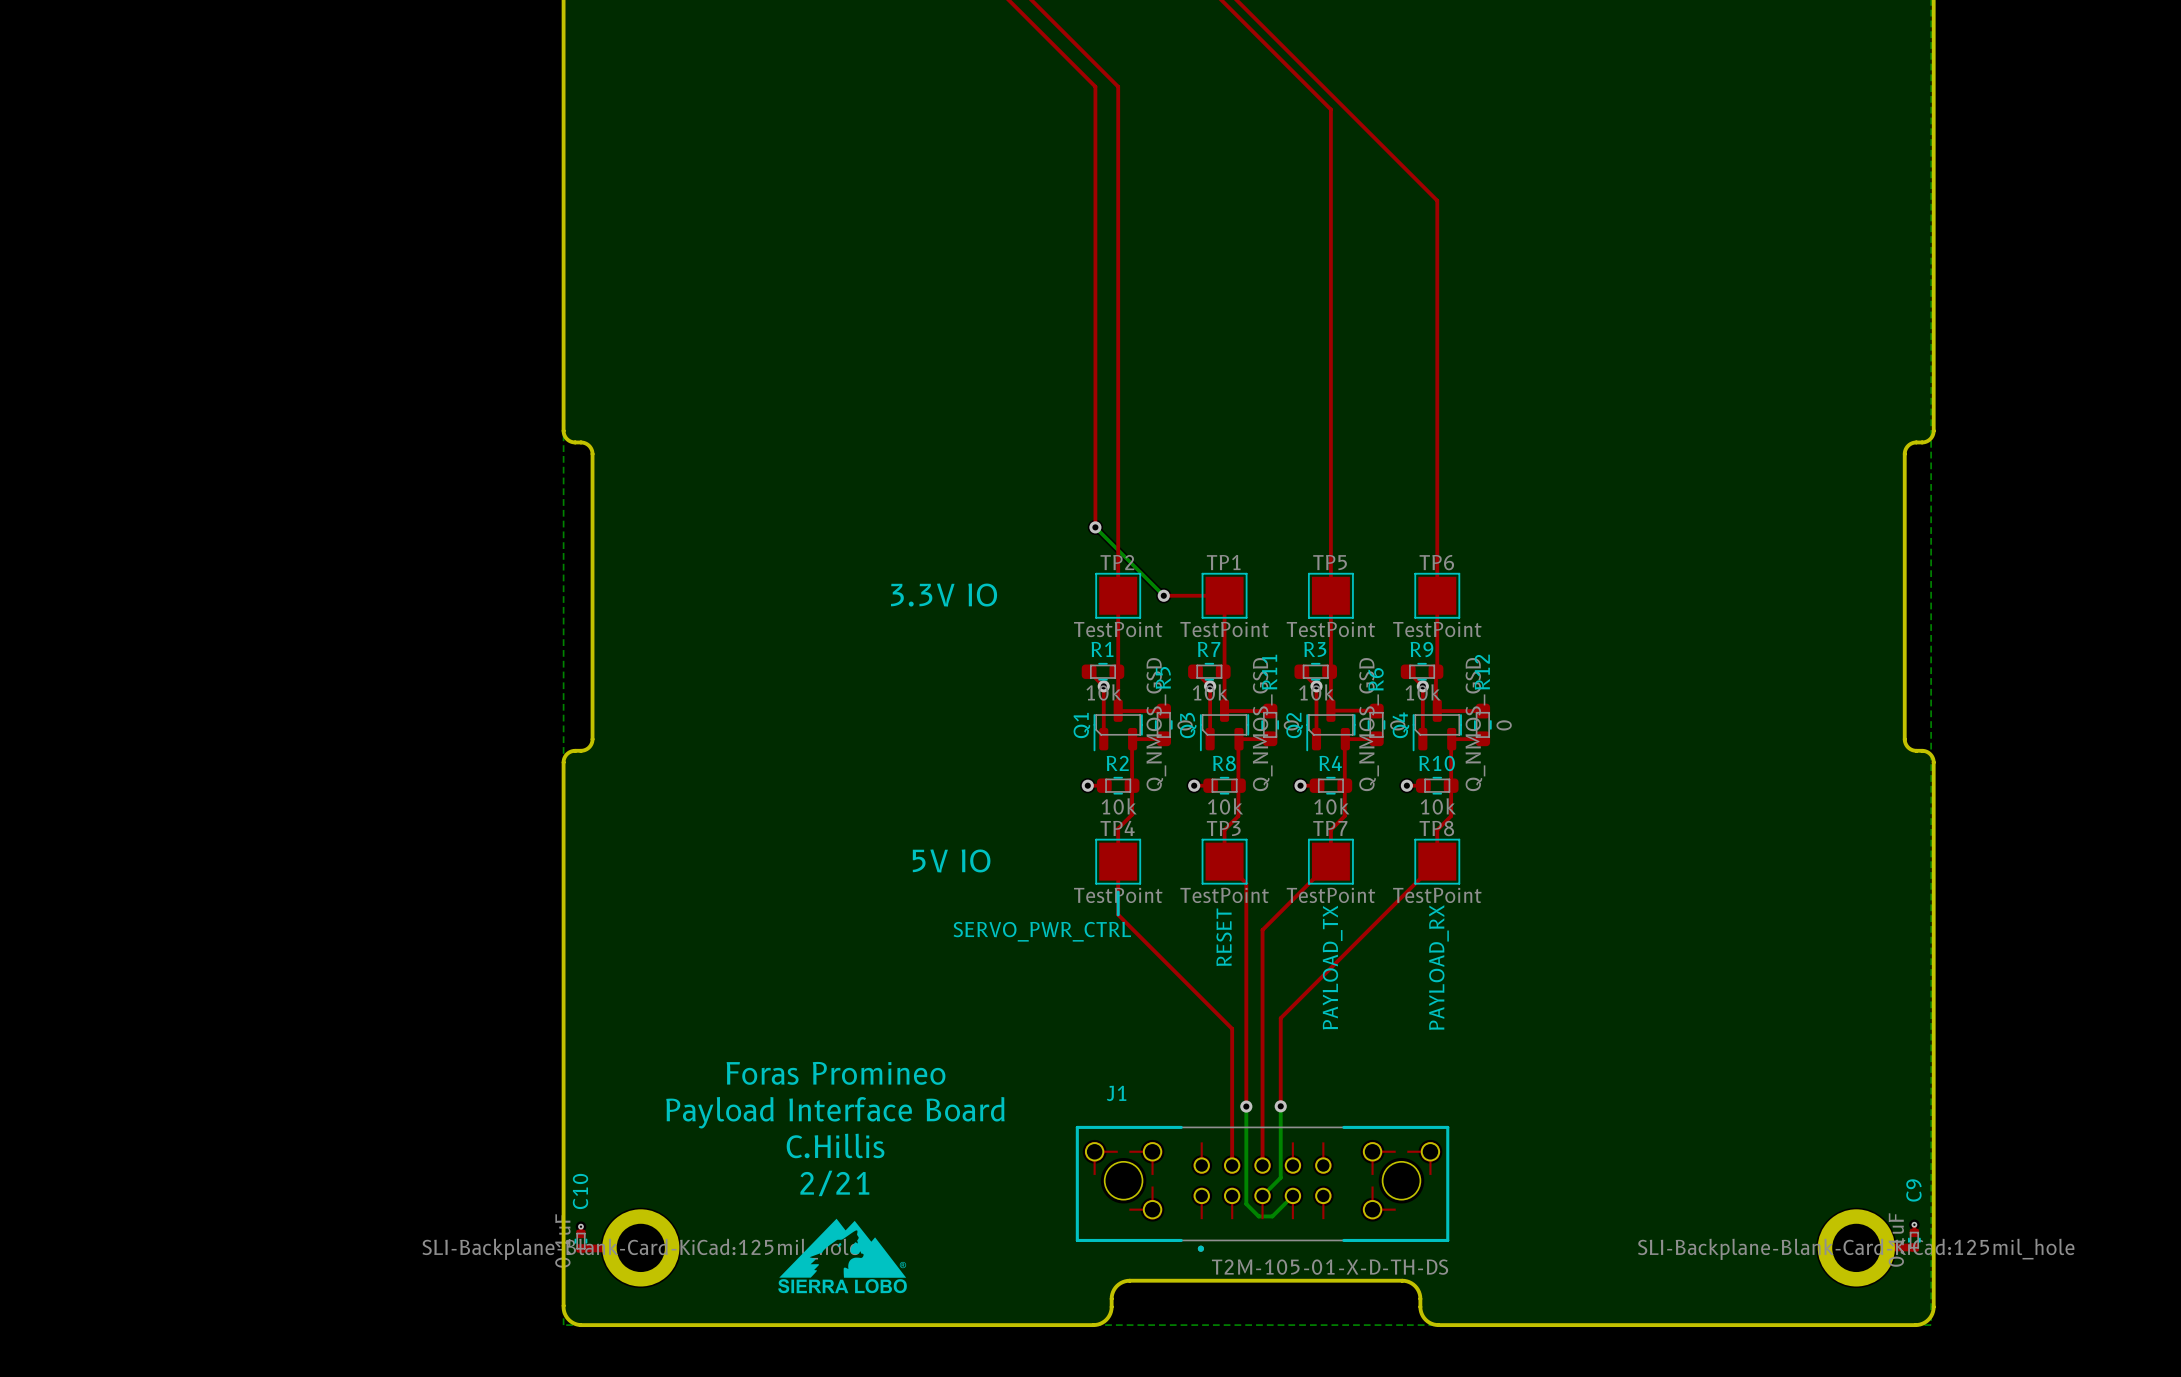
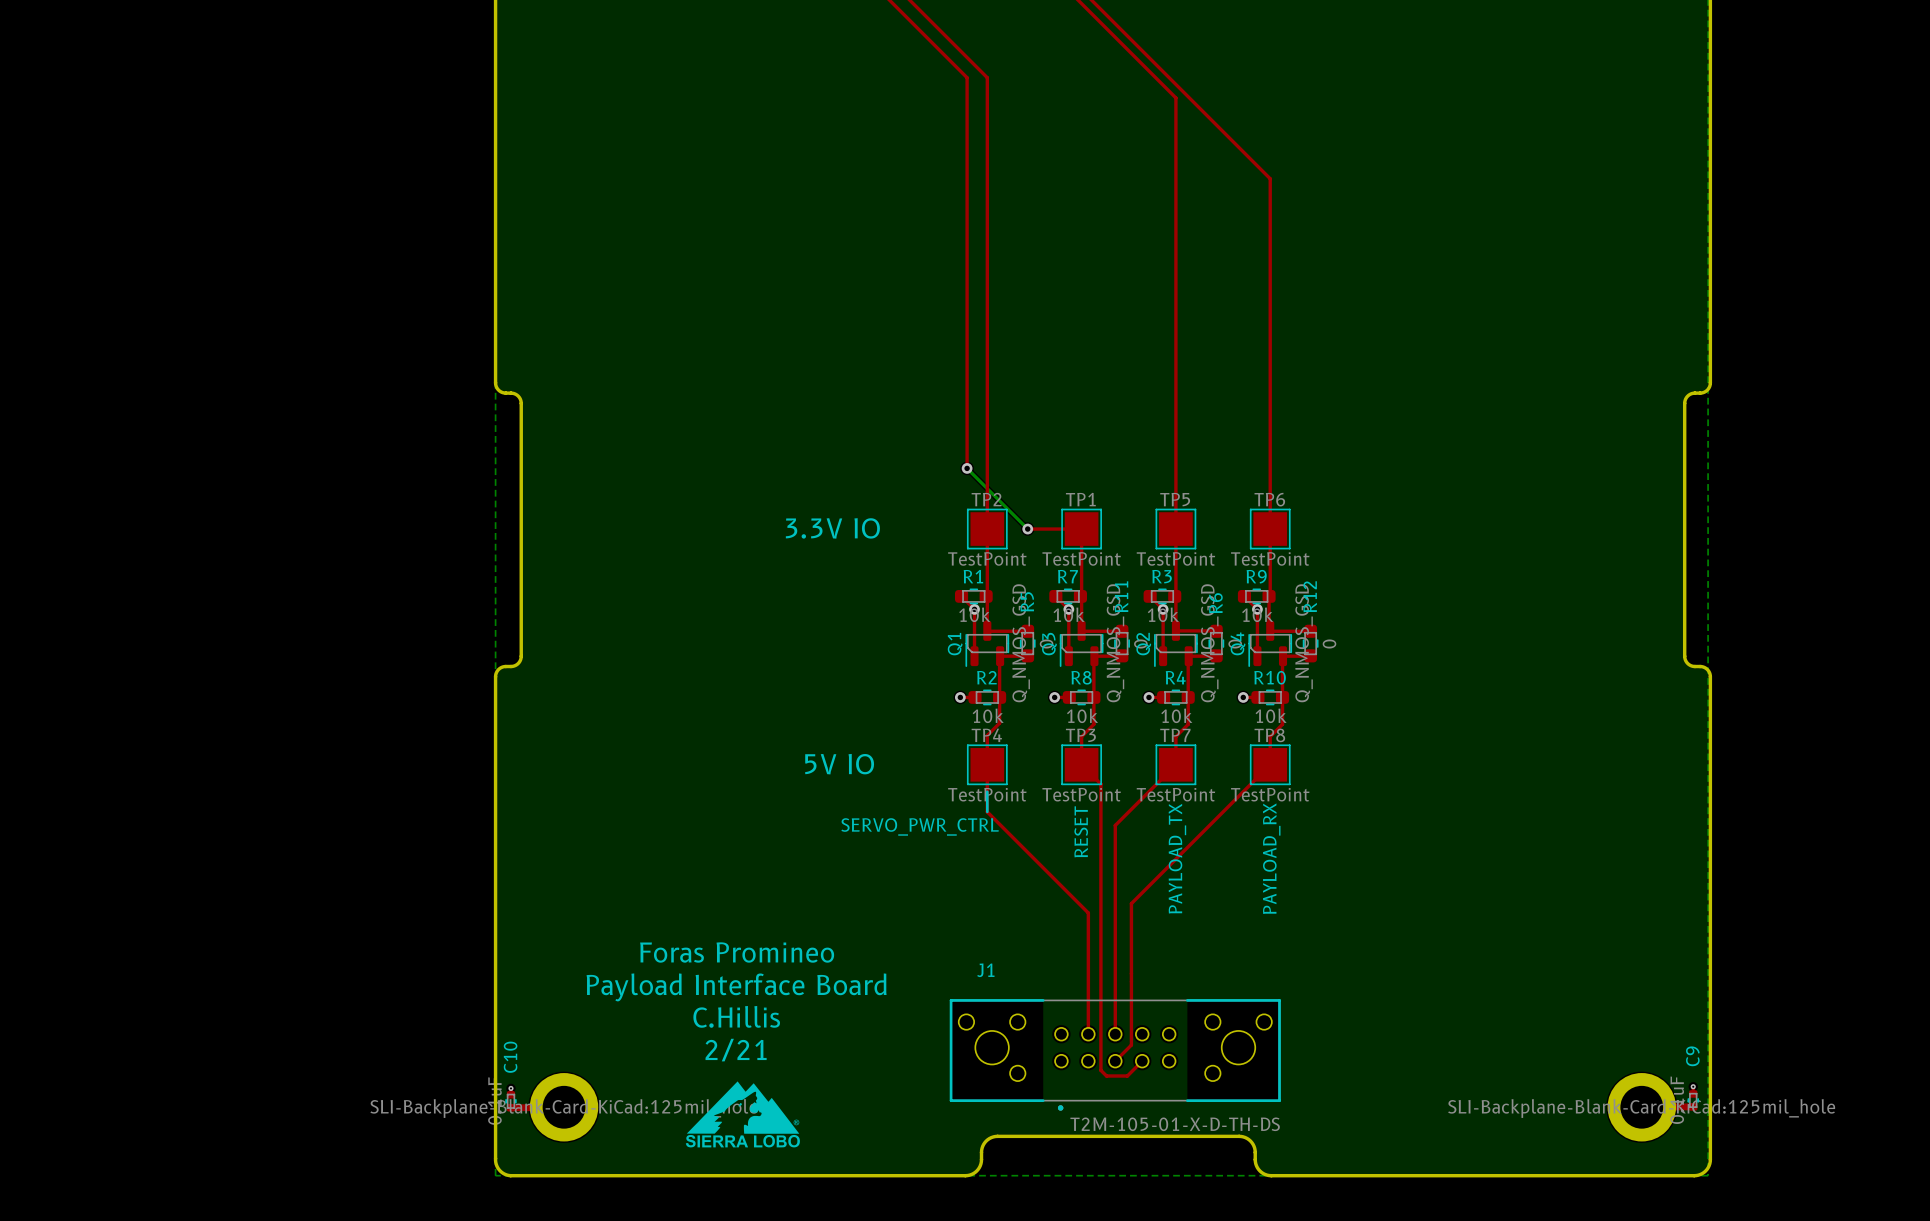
top track: none -> (1100, 981) (1100, 1070) (1106, 1076) (1127, 1076) (1142, 1061)
bottom track: (1246, 1106) (1246, 1204) (1258, 1216) (1272, 1216) (1292, 1195) -> none
via: (1246, 1106) -> none
top track: none -> (1131, 981) (1131, 1045) (1115, 1061)
bottom track: (1280, 1106) (1280, 1177) (1262, 1195) -> none
via: (1280, 1106) -> none
J1 footprint: [1075, 1125, 1450, 1252] -> [949, 999, 1281, 1111]

